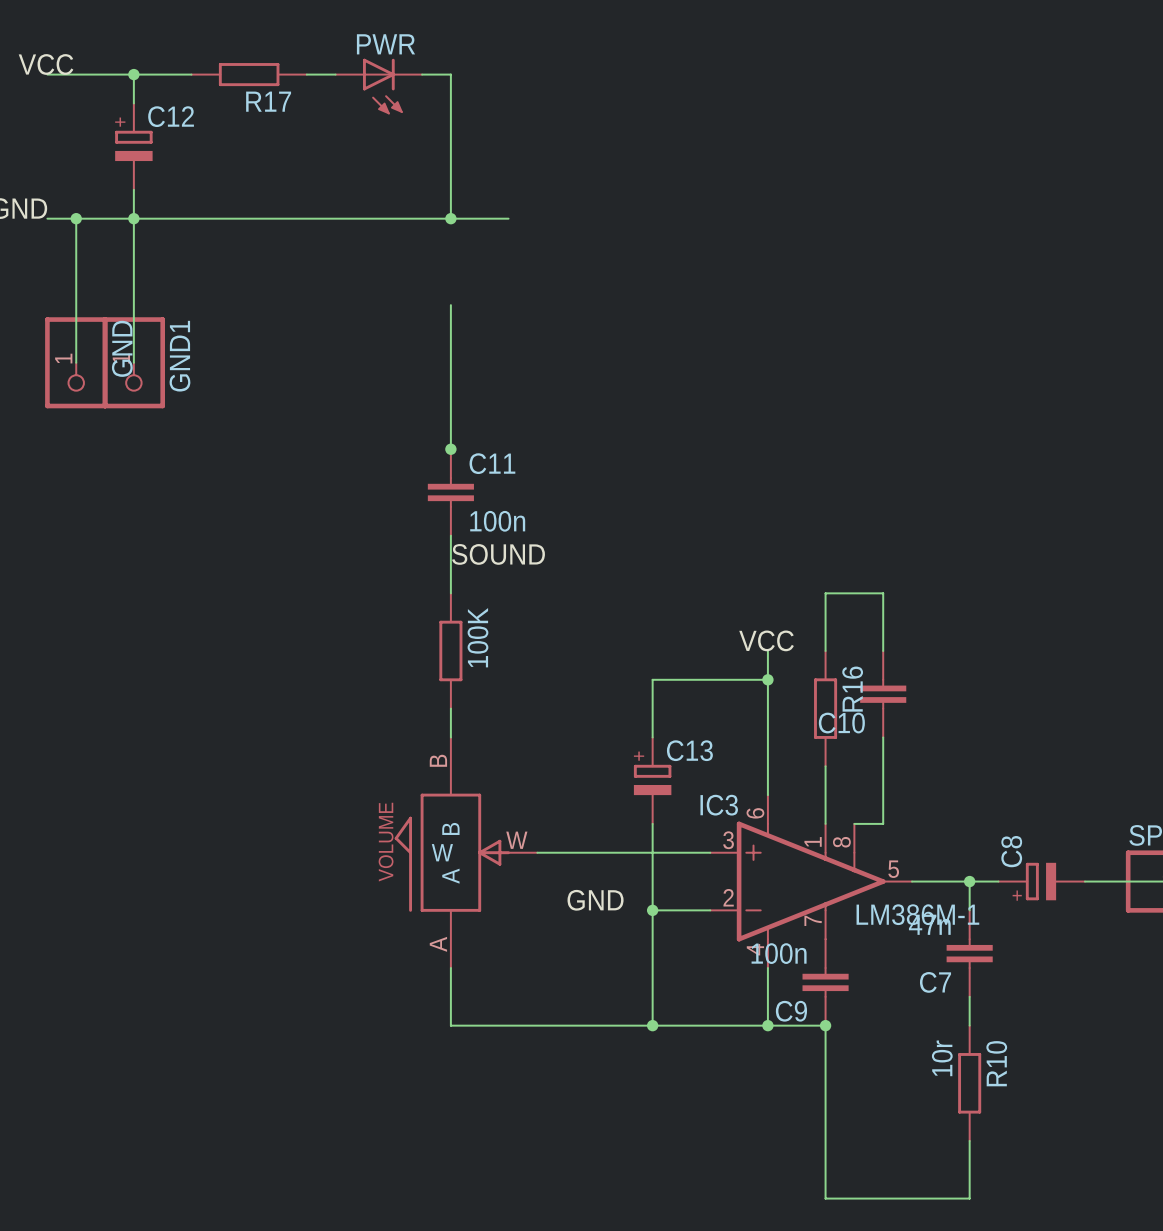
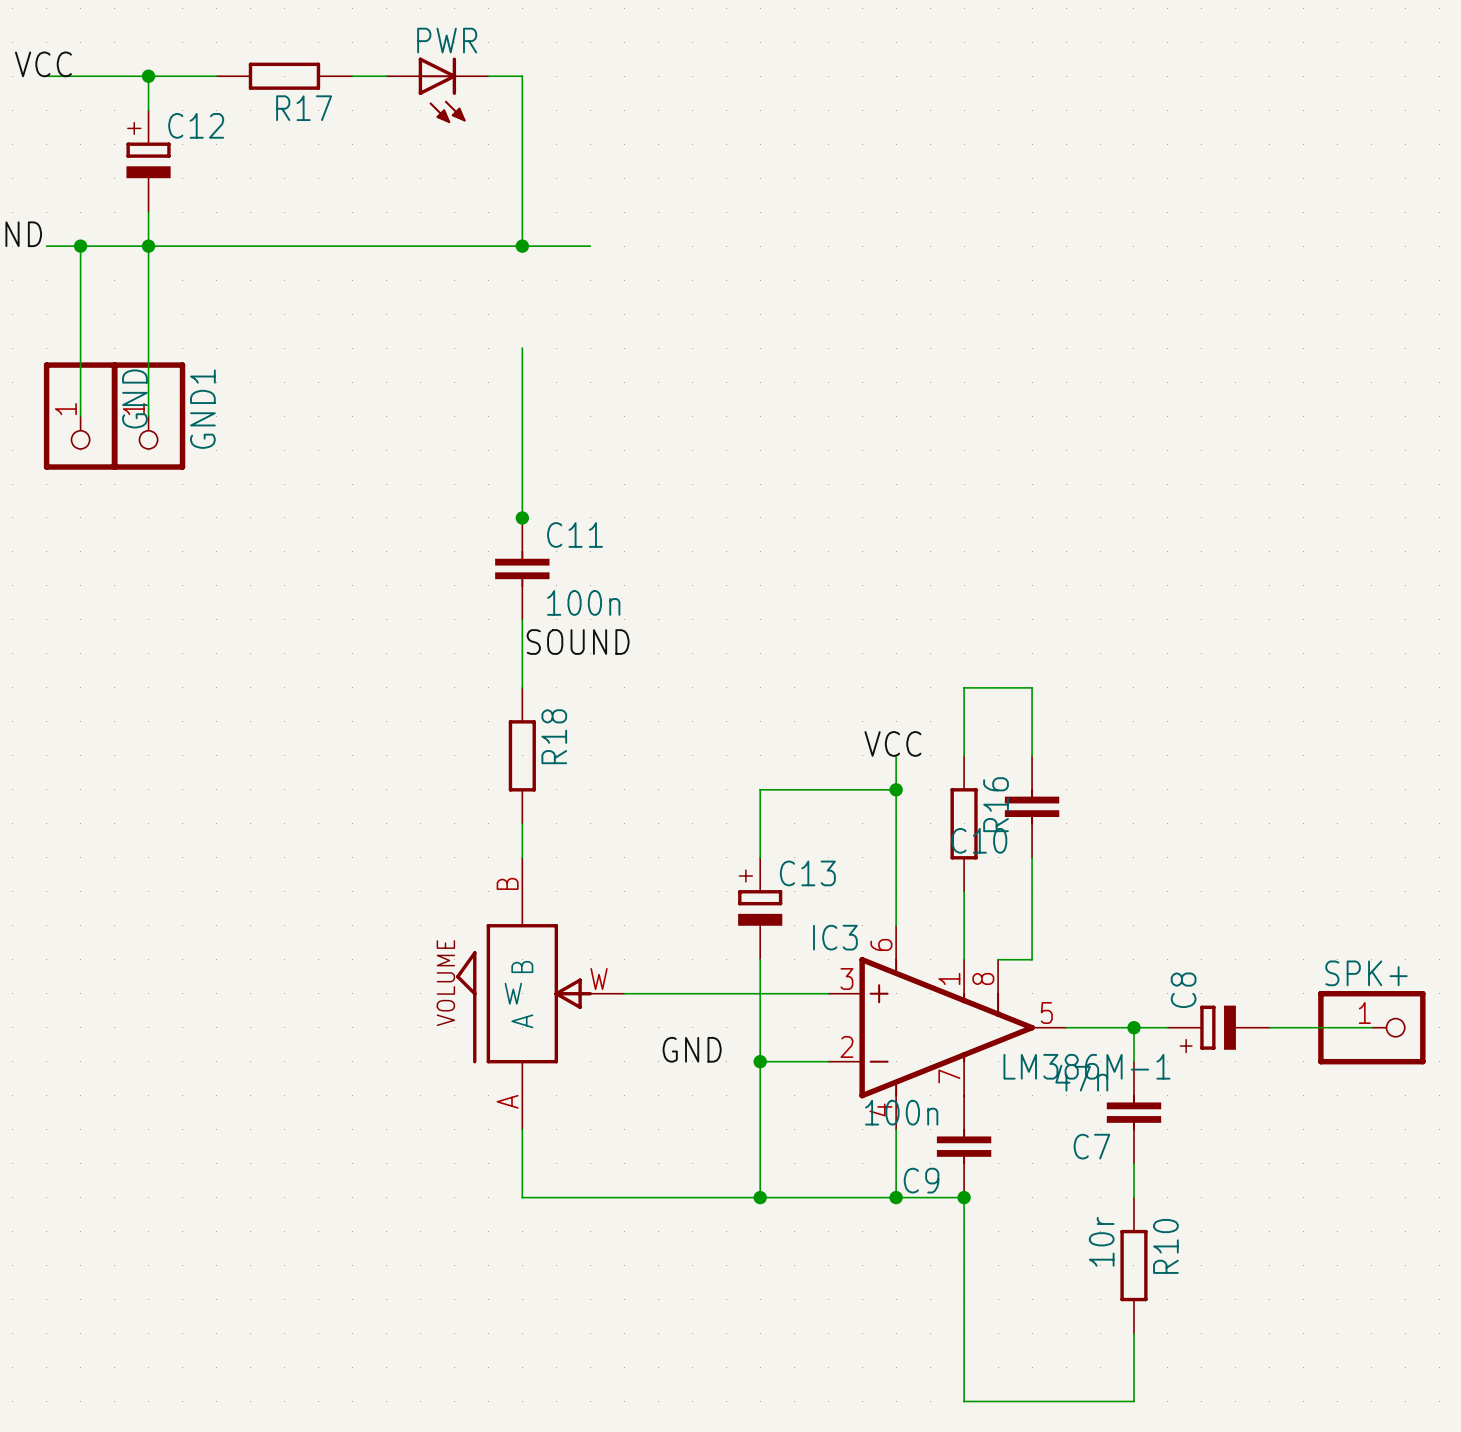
100K name: 100K (477, 637) -> R18 (554, 736)

